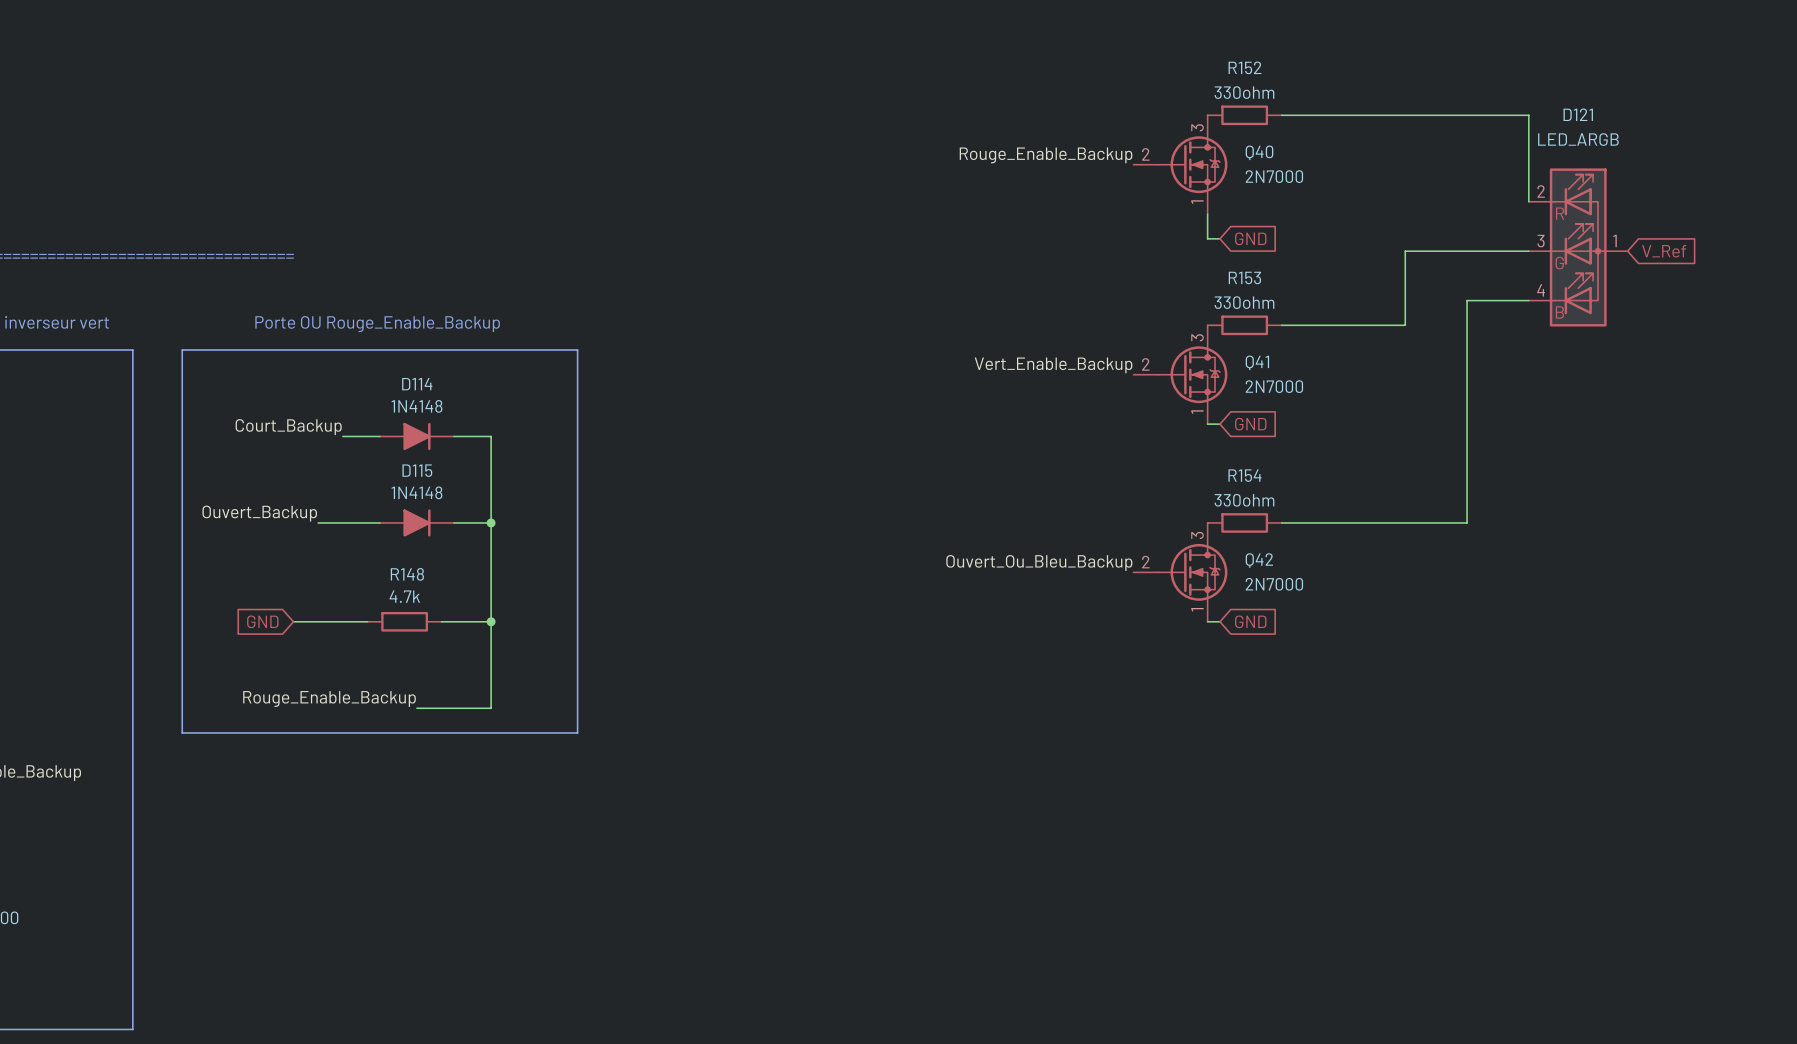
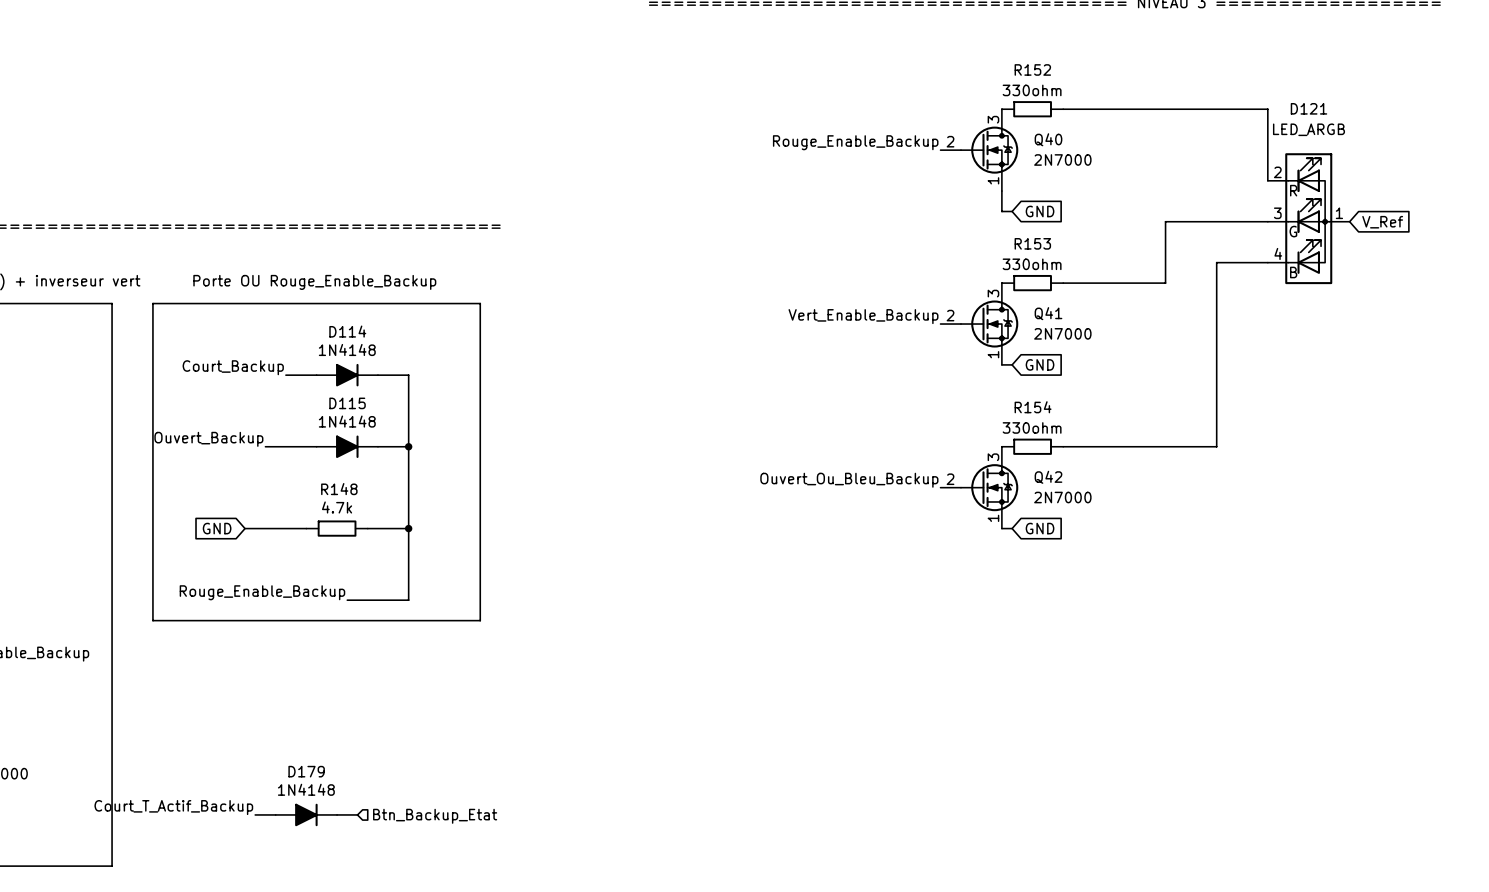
label: none -> Court_T_Actif_Backup (173, 807)
wire: none -> (255, 814) (275, 814)
D179: none -> 1N4148 (306, 814)
wire: none -> (337, 814) (357, 814)
hierarchical label: none -> Btn_Backup_Etat (435, 816)

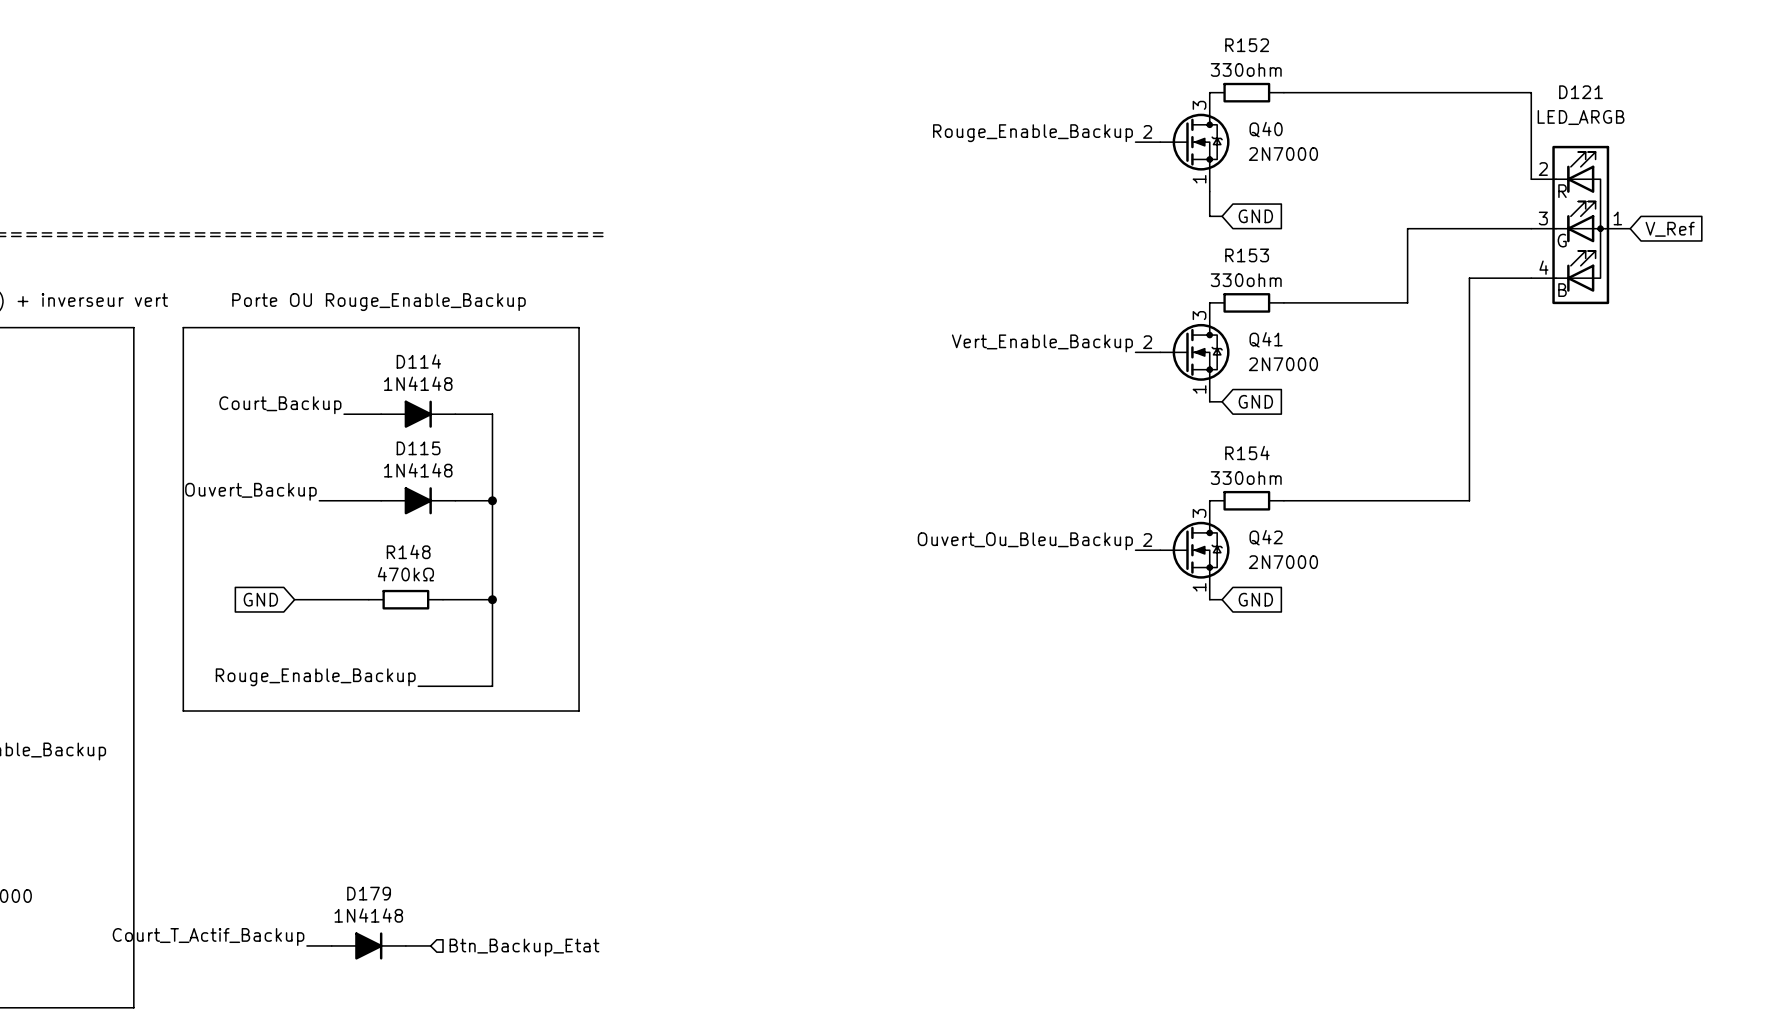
R148 value: 4.7k (337, 507) -> 470kΩ (405, 574)

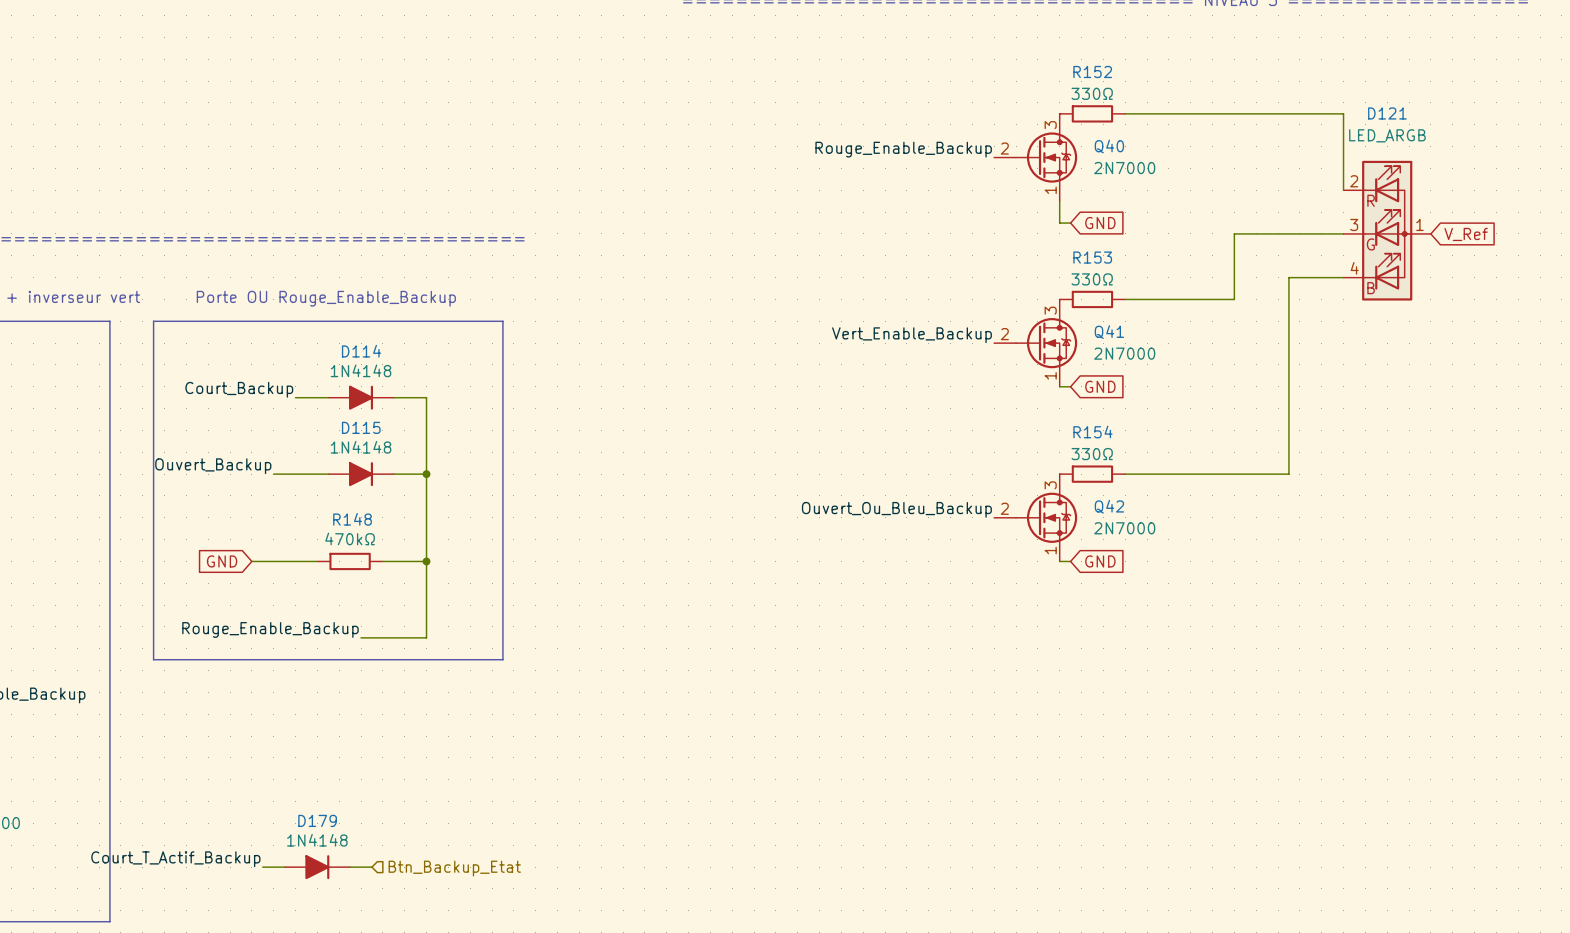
R152 value: 330ohm (1246, 69) -> 330Ω (1092, 93)
R153 value: 330ohm (1246, 280) -> 330Ω (1092, 279)
R154 value: 330ohm (1246, 478) -> 330Ω (1092, 454)

